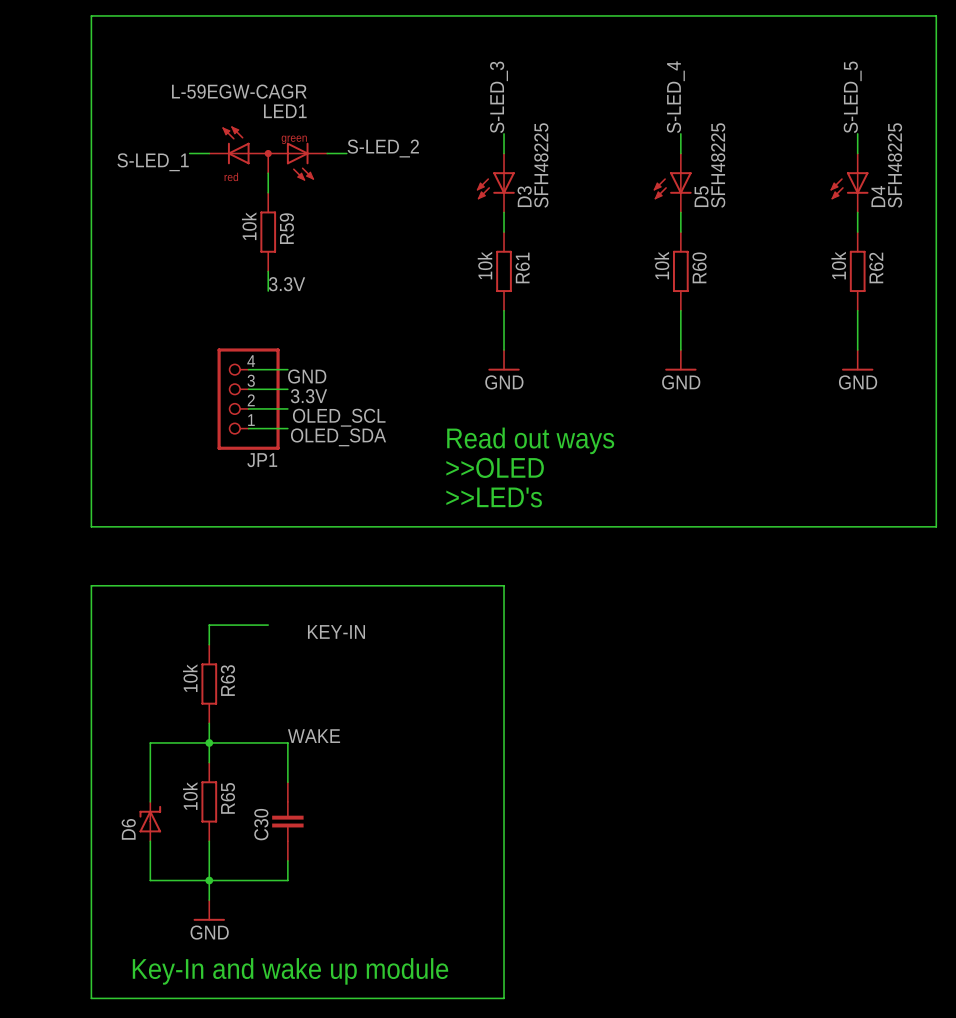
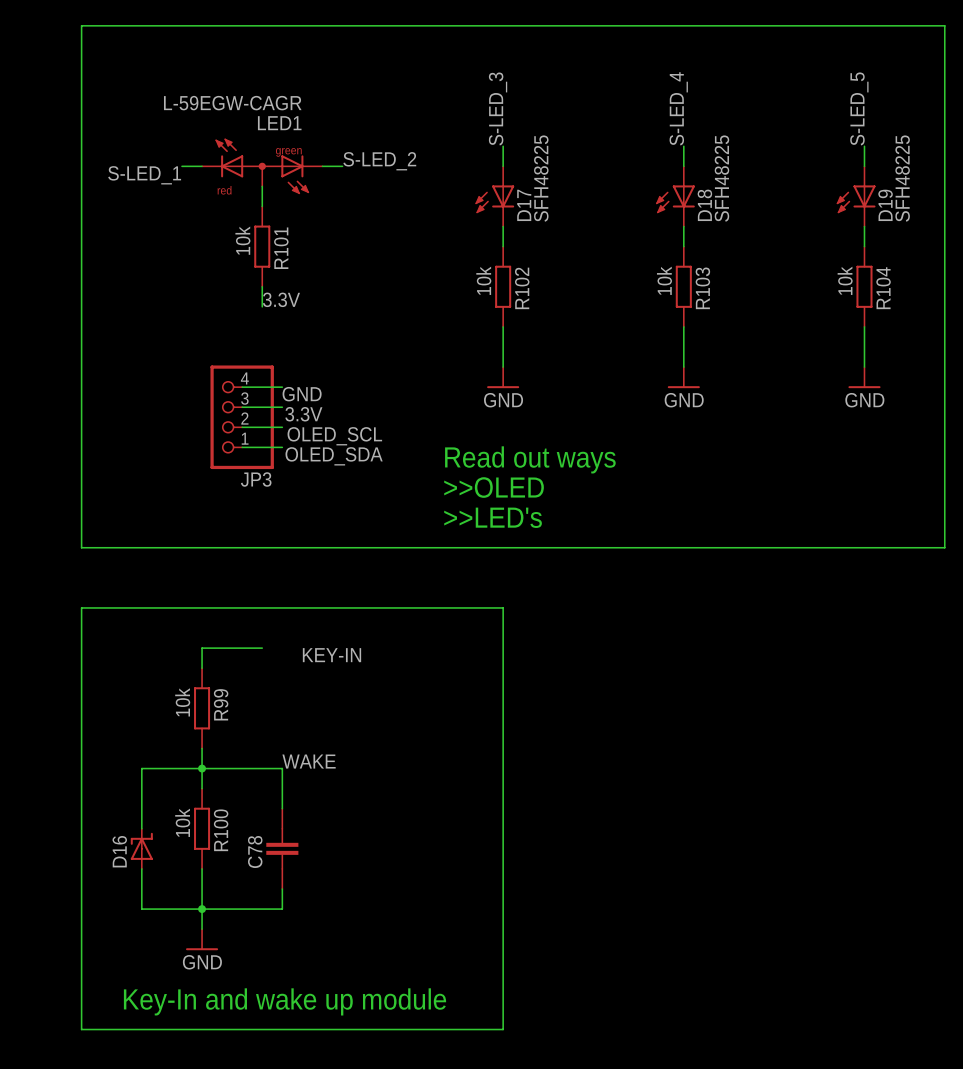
D3 name: D3 (524, 196) -> D17 (524, 205)
D5 name: D5 (701, 196) -> D18 (704, 205)
D4 name: D4 (878, 196) -> D19 (885, 205)
R59 name: R59 (286, 228) -> R101 (281, 248)
R61 name: R61 (522, 267) -> R102 (522, 288)
R60 name: R60 (699, 267) -> R103 (702, 288)
R62 name: R62 (876, 267) -> R104 (883, 288)
JP1 name: JP1 (262, 460) -> JP3 (256, 479)
R63 name: R63 (227, 680) -> R99 (221, 704)
R65 name: R65 (227, 798) -> R100 (221, 830)
C30 name: C30 (261, 824) -> C78 (255, 852)
D6 name: D6 (128, 829) -> D16 (119, 851)

